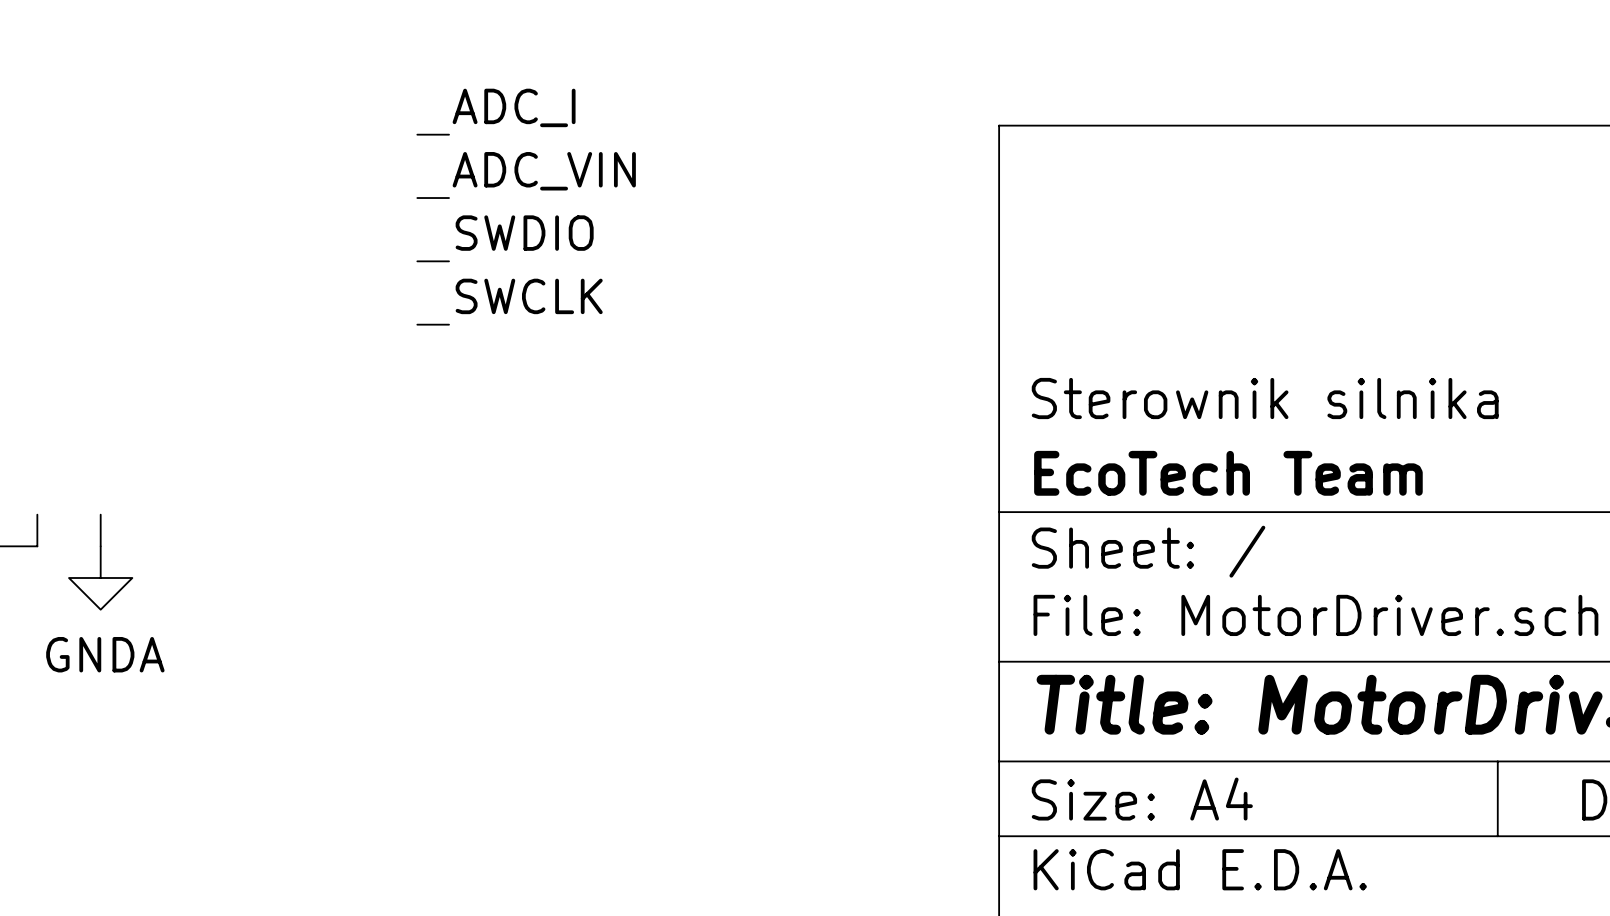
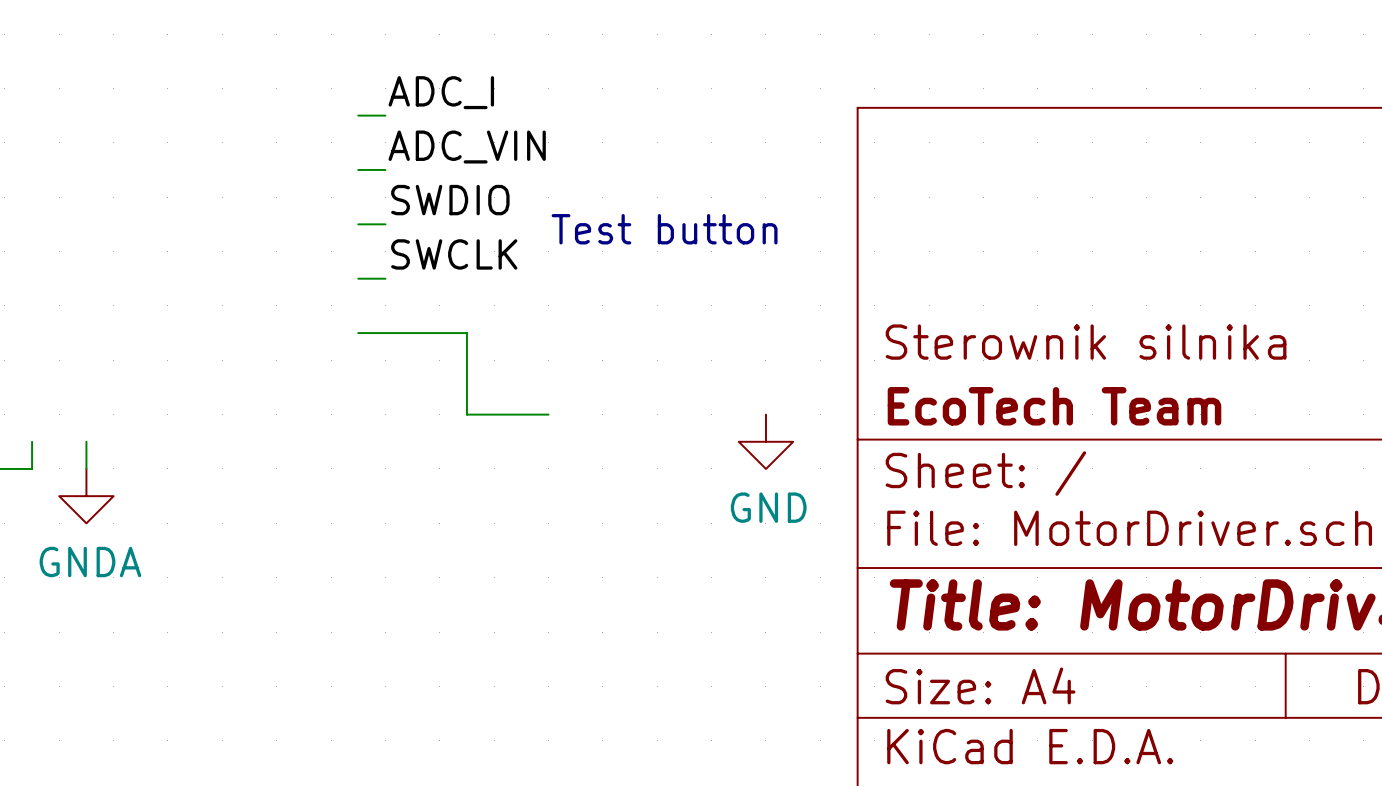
text: none -> Test button (664, 229)
wire: none -> (358, 333) (466, 333) (466, 414) (548, 414)
power symbol: none -> GND (765, 441)

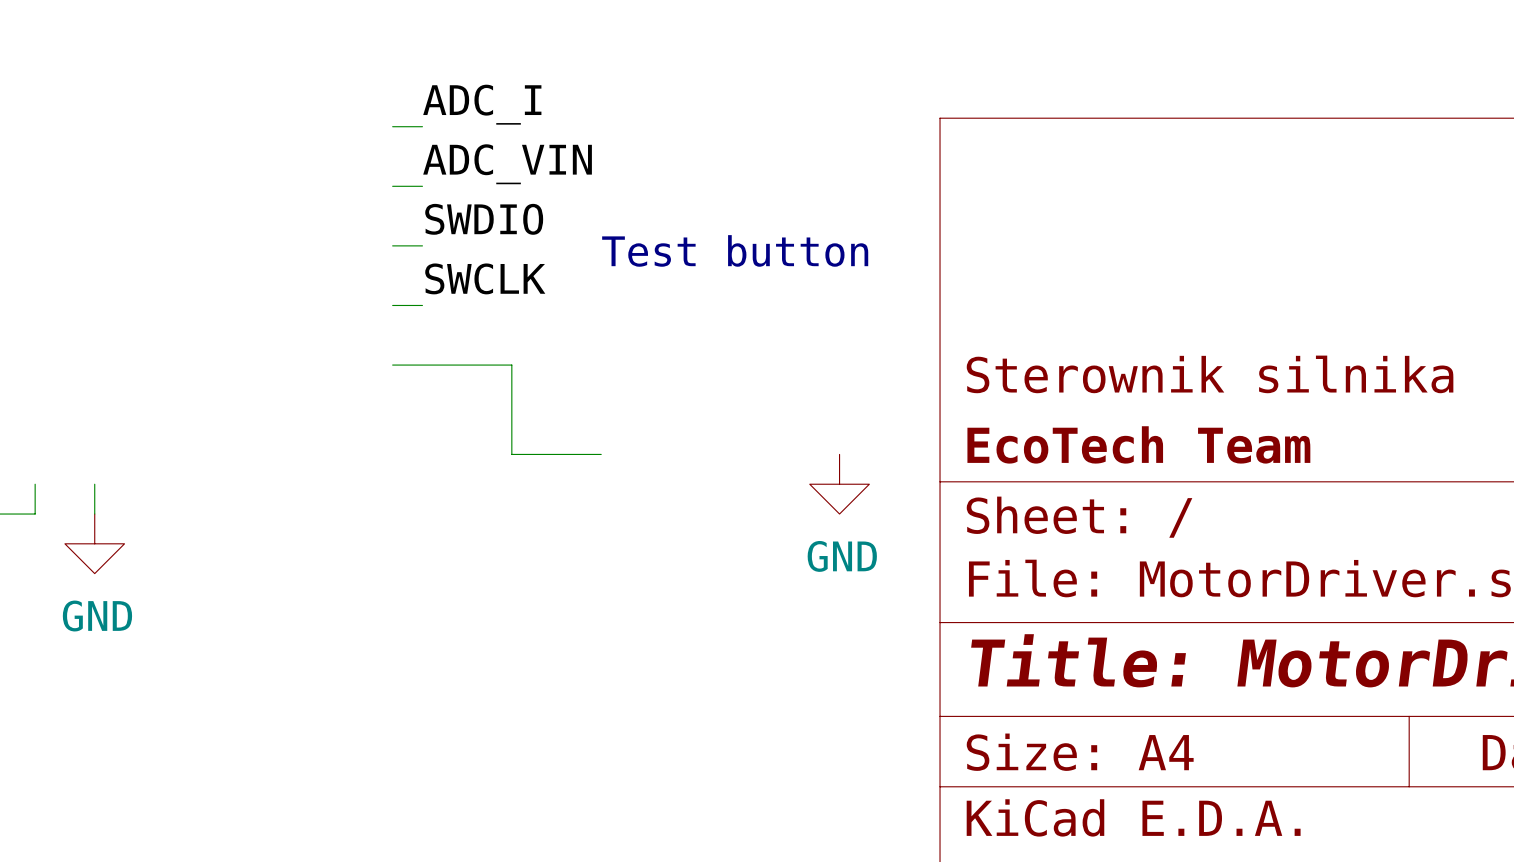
power symbol: GNDA (86, 496) -> GND (94, 543)

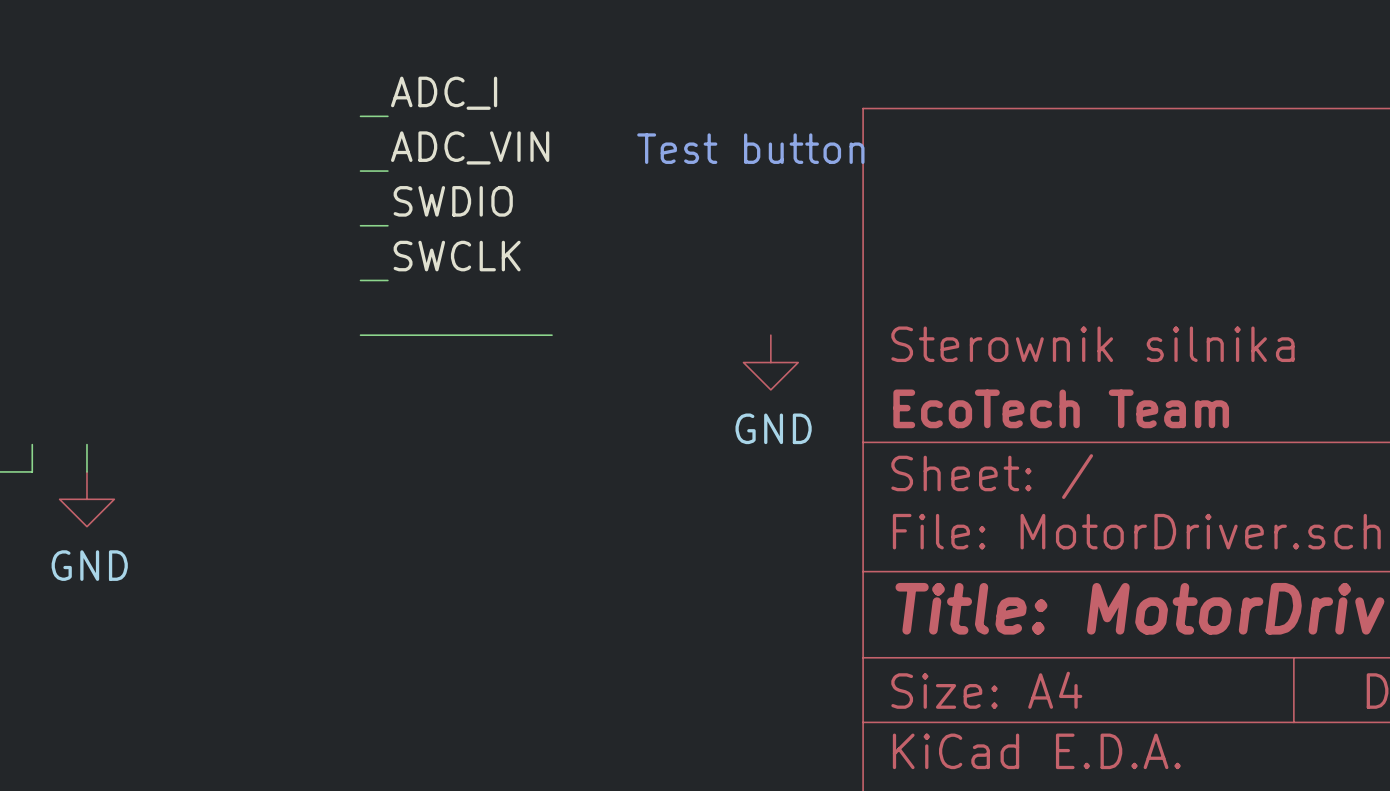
text position: Test button (735, 250) -> Test button (750, 148)
wire: (511, 365) (511, 454) (601, 454) -> (469, 335) (552, 335)
power symbol position: GND (839, 484) -> GND (770, 362)

